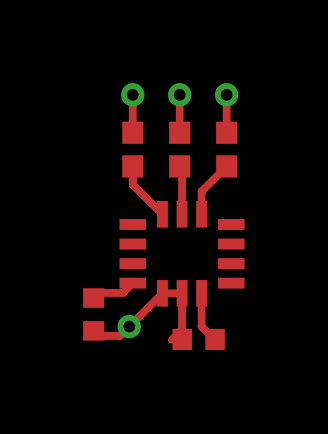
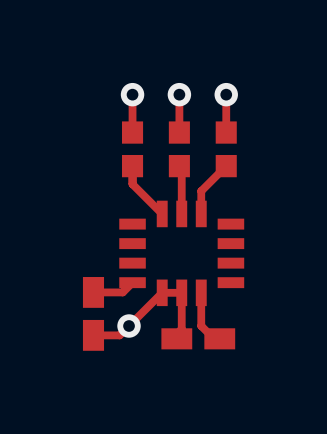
part footprint: [83, 288, 105, 341] -> [82, 277, 105, 351]
part footprint: [172, 328, 225, 350] -> [161, 328, 236, 350]

